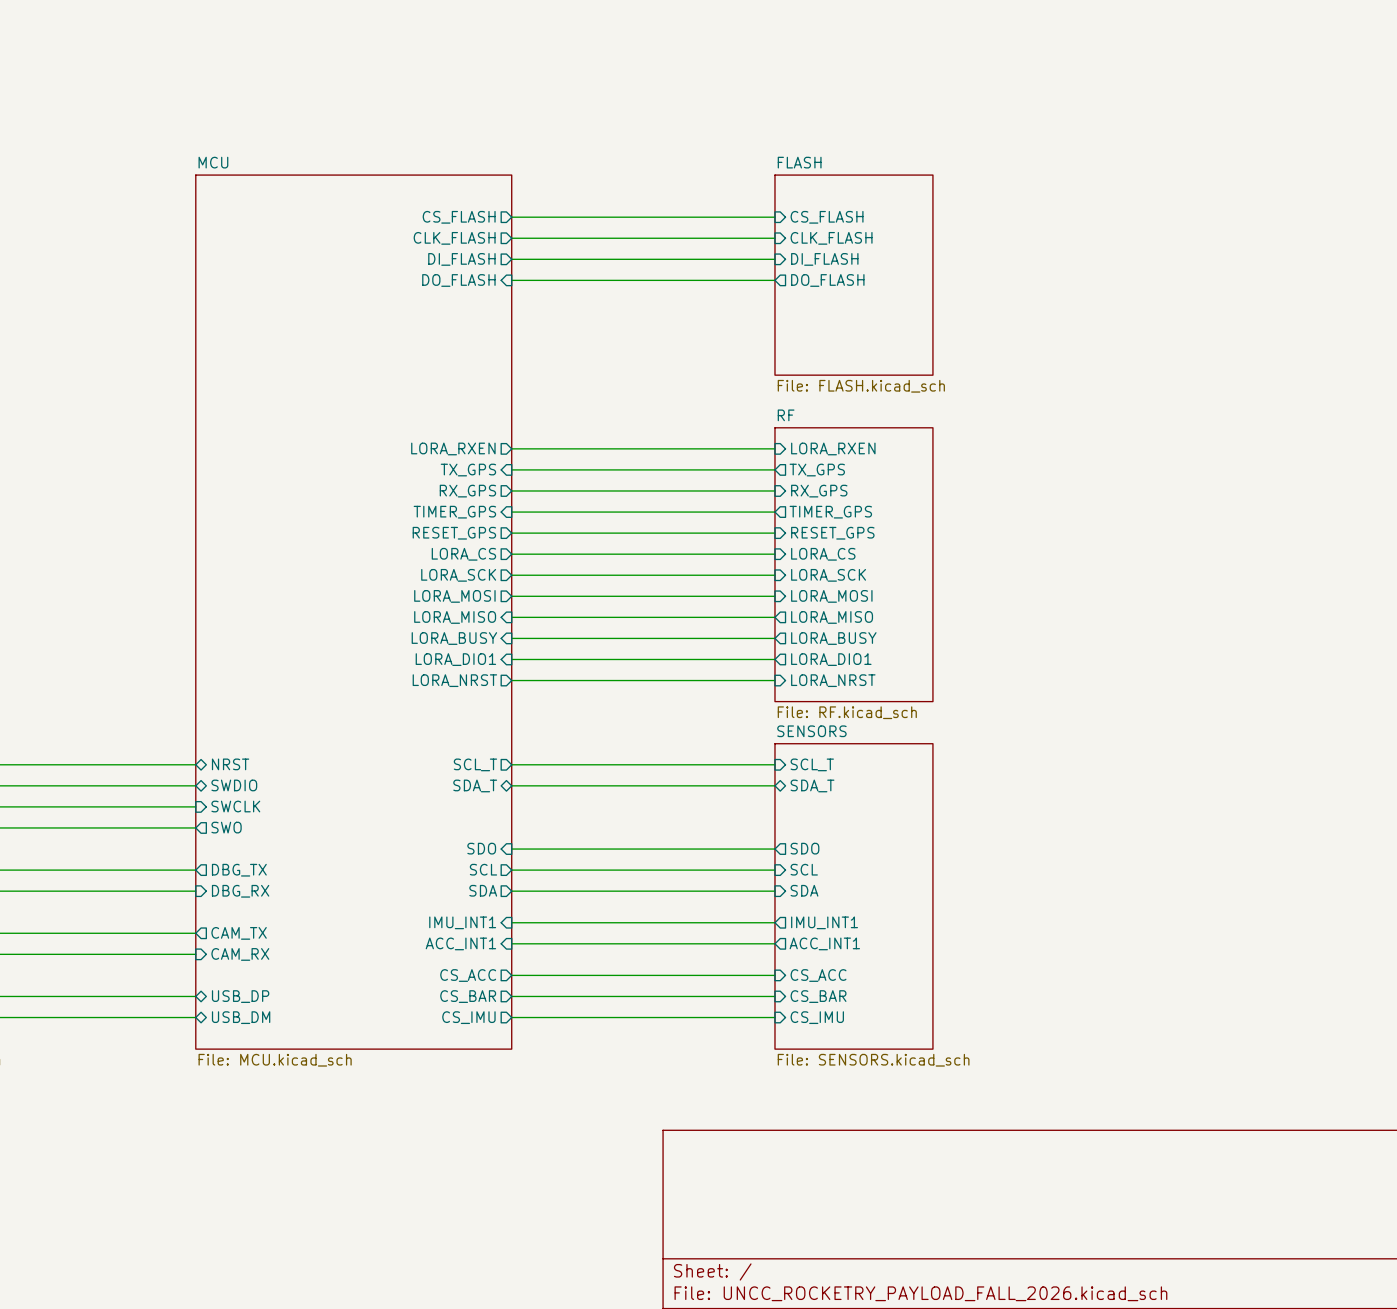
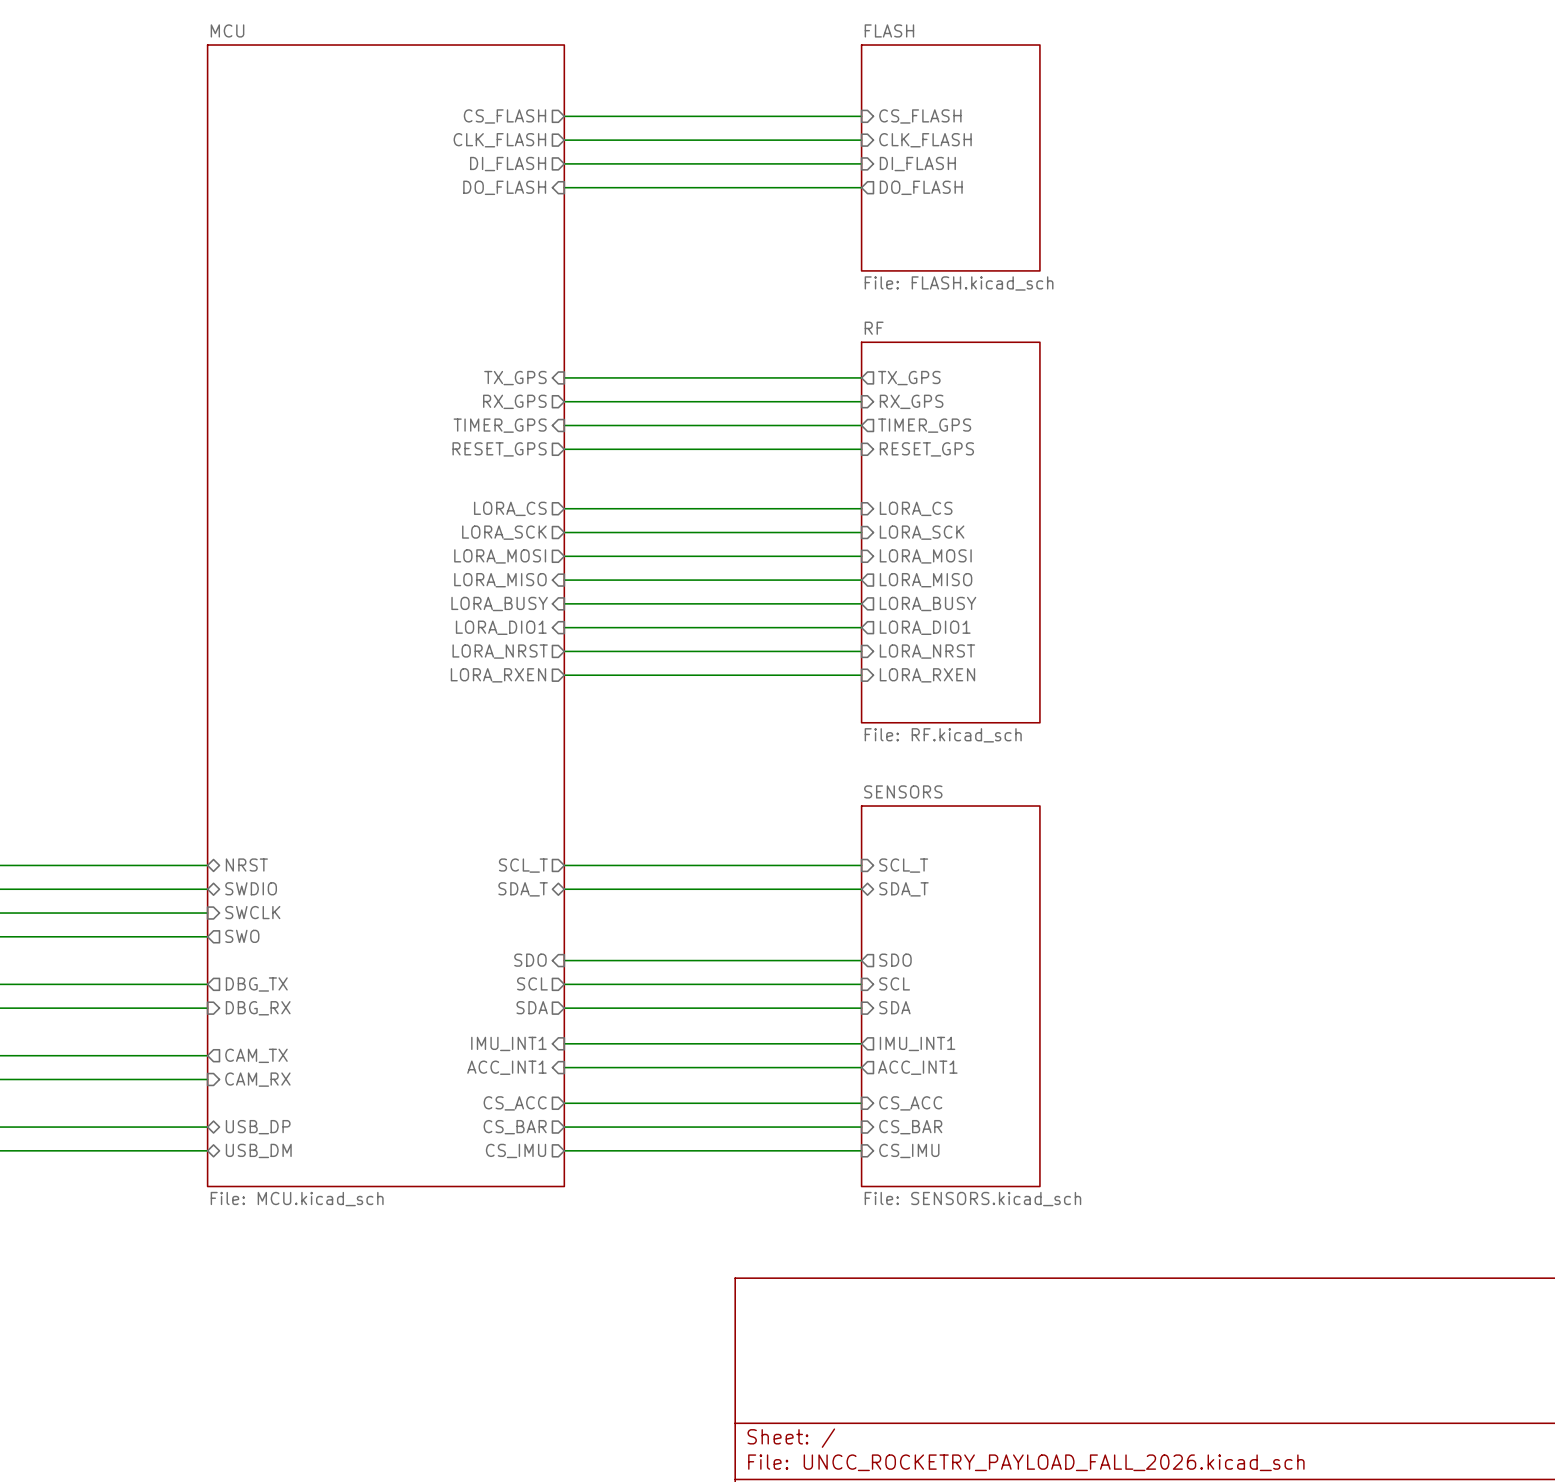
wire: none -> (564, 116) (861, 116)
sheet pin position: CS_FLASH (459, 217) -> CS_FLASH (504, 116)
wire: (511, 217) (774, 217) -> (564, 377) (861, 377)
sheet pin position: CS_FLASH (827, 217) -> CS_FLASH (920, 116)
sheet pin position: CLK_FLASH (454, 238) -> CLK_FLASH (499, 140)
wire: (511, 238) (774, 238) -> (564, 140) (861, 140)
sheet pin position: CLK_FLASH (831, 238) -> CLK_FLASH (925, 140)
sheet pin position: DI_FLASH (461, 259) -> DI_FLASH (508, 164)
wire: (511, 259) (774, 259) -> (564, 163) (861, 163)
sheet pin position: DI_FLASH (824, 259) -> DI_FLASH (917, 164)
sheet FLASH position: (853, 275) -> (950, 157)
sheet pin position: DO_FLASH (458, 280) -> DO_FLASH (504, 187)
wire: (511, 280) (774, 280) -> (564, 187) (861, 187)
sheet pin position: DO_FLASH (827, 280) -> DO_FLASH (921, 187)
sheet pin: none -> TX_GPS (515, 378)
sheet pin: none -> TX_GPS (909, 378)
sheet pin: none -> RX_GPS (514, 401)
wire: none -> (564, 401) (861, 401)
sheet pin: none -> RX_GPS (911, 401)
sheet pin: none -> TIMER_GPS (500, 425)
wire: none -> (564, 425) (861, 425)
sheet pin: none -> TIMER_GPS (924, 425)
sheet pin: none -> RESET_GPS (499, 449)
wire: none -> (564, 449) (861, 449)
sheet pin: none -> RESET_GPS (926, 449)
sheet pin: LORA_RXEN (453, 448) -> LORA_CS (510, 508)
sheet pin: LORA_RXEN (833, 448) -> LORA_CS (916, 508)
sheet RF: none -> File: RF.kicad_sch (950, 532)
sheet pin shape: input (468, 470) -> output (504, 532)
sheet pin: TX_GPS (468, 470) -> LORA_SCK (504, 532)
sheet pin shape: output (817, 470) -> input (922, 532)
sheet pin: TX_GPS (817, 470) -> LORA_SCK (922, 532)
sheet pin: RX_GPS (467, 491) -> LORA_MOSI (500, 556)
sheet pin: RX_GPS (819, 491) -> LORA_MOSI (925, 556)
sheet pin: TIMER_GPS (454, 512) -> LORA_MISO (500, 580)
sheet pin: TIMER_GPS (830, 512) -> LORA_MISO (926, 580)
sheet pin shape: output (454, 533) -> input (499, 603)
sheet pin: RESET_GPS (454, 533) -> LORA_BUSY (499, 603)
sheet pin shape: input (832, 533) -> output (928, 603)
sheet pin: RESET_GPS (832, 533) -> LORA_BUSY (928, 603)
sheet MCU: none -> File: MCU.kicad_sch (385, 615)
sheet pin shape: output (463, 554) -> input (501, 627)
sheet pin: LORA_CS (463, 554) -> LORA_DIO1 (501, 627)
sheet pin shape: input (823, 554) -> output (925, 627)
sheet pin: LORA_CS (823, 554) -> LORA_DIO1 (925, 627)
sheet RF: File: RF.kicad_sch (853, 564) -> none
sheet pin: LORA_SCK (458, 575) -> LORA_NRST (500, 651)
sheet pin: LORA_SCK (828, 575) -> LORA_NRST (927, 651)
sheet pin: LORA_MOSI (454, 596) -> LORA_RXEN (498, 675)
sheet pin: LORA_MOSI (831, 596) -> LORA_RXEN (927, 675)
sheet MCU: File: MCU.kicad_sch (353, 612) -> none
sheet pin: LORA_MISO (455, 617) -> none
wire: (511, 617) (774, 617) -> none
sheet pin: LORA_MISO (832, 617) -> none
sheet pin: LORA_BUSY (454, 638) -> none
wire: (511, 638) (774, 638) -> none
sheet pin: LORA_BUSY (833, 638) -> none
sheet pin: LORA_DIO1 (455, 659) -> none
wire: (511, 659) (774, 659) -> none
sheet pin: LORA_DIO1 (831, 659) -> none
sheet pin: LORA_NRST (454, 680) -> none
wire: (511, 680) (774, 680) -> none
sheet pin: LORA_NRST (833, 680) -> none
sheet SENSORS: none -> File: SENSORS.kicad_sch (950, 996)
sheet SENSORS: File: SENSORS.kicad_sch (853, 896) -> none

